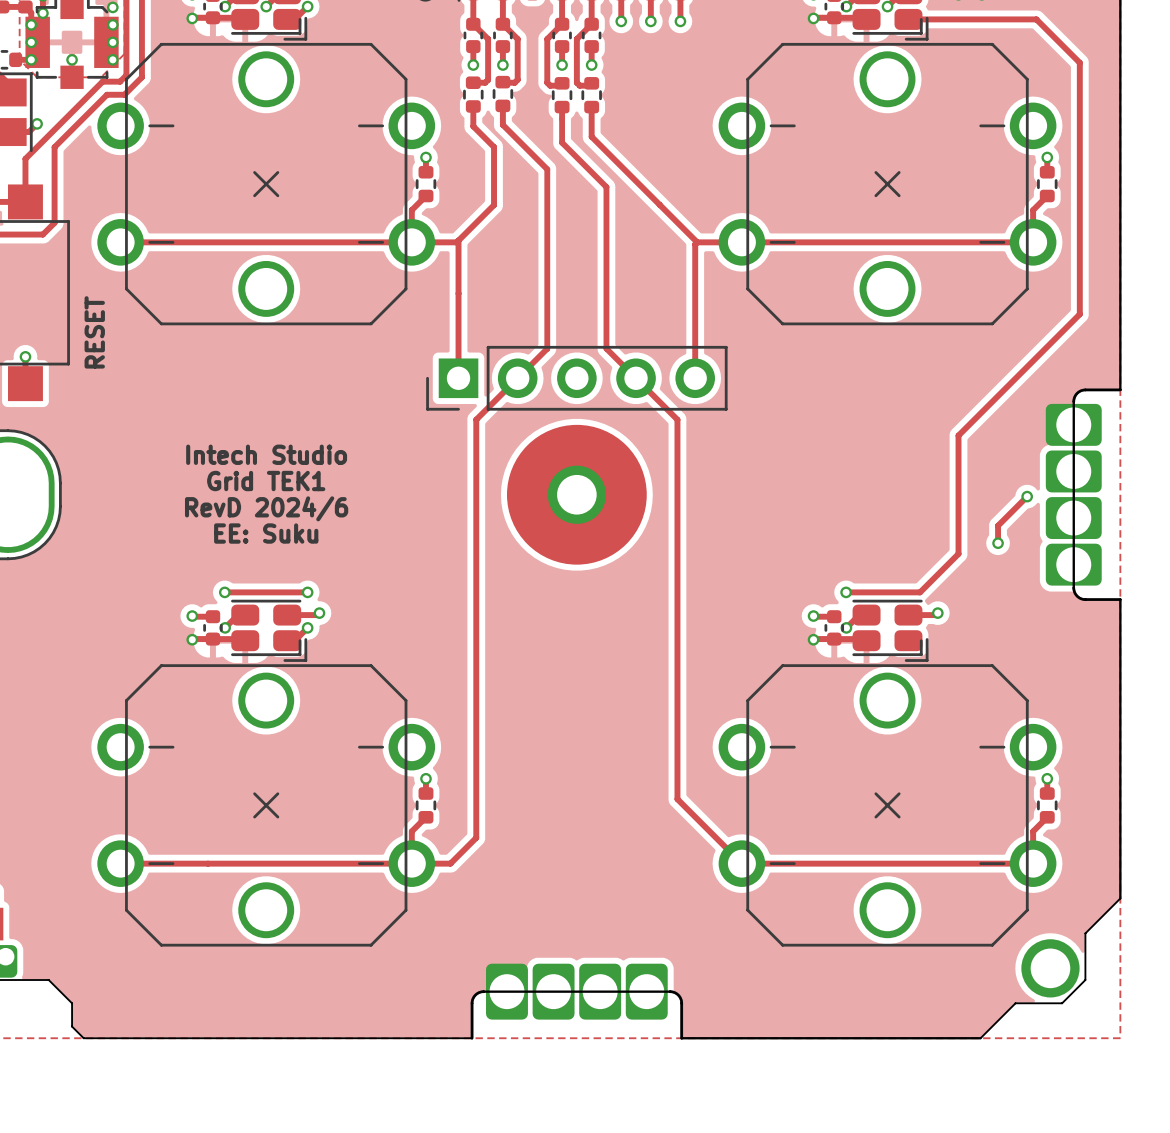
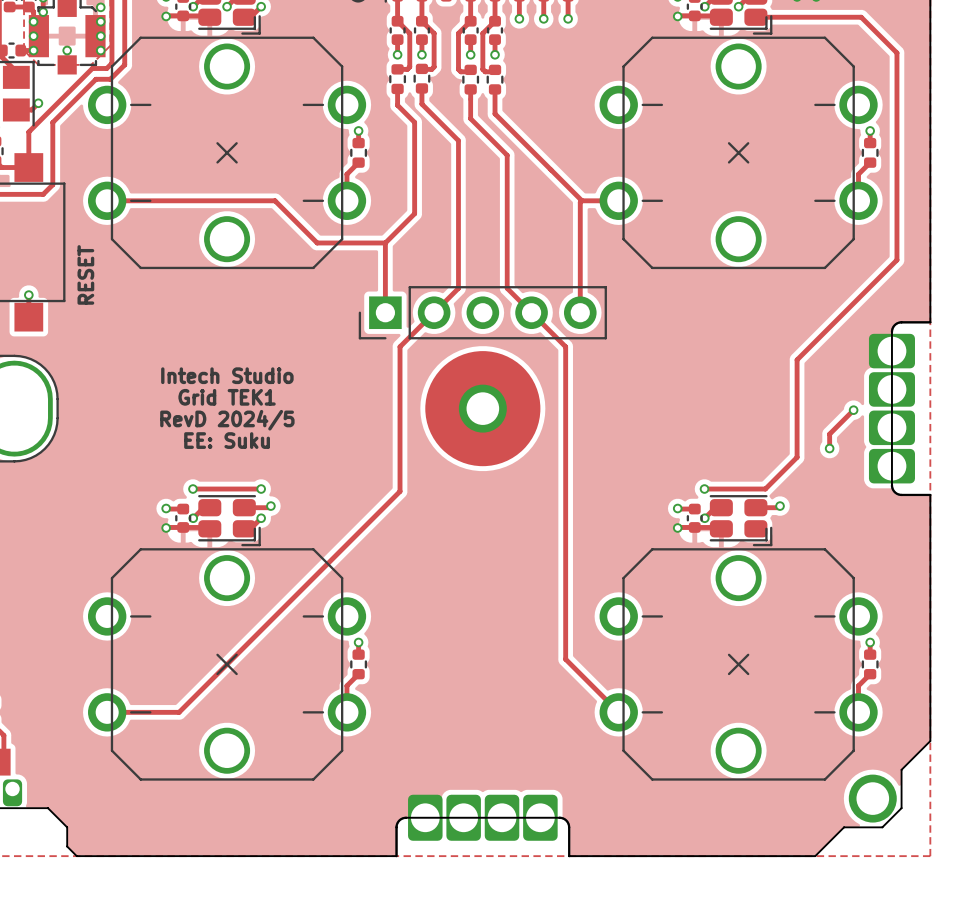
track: (494, 205) (456, 242) (324, 242) -> (414, 170) (414, 213) (385, 242) (317, 242) (275, 200)
track: (458, 240) (458, 293) -> none
track: (741, 242) (1033, 242) -> none
text: RevD 2024/6 (266, 508) -> RevD 2024/5 (227, 420)
track: (476, 595) (476, 837) (450, 863) (207, 863) -> (400, 491) (179, 712)
track: (741, 863) (1033, 863) -> none

